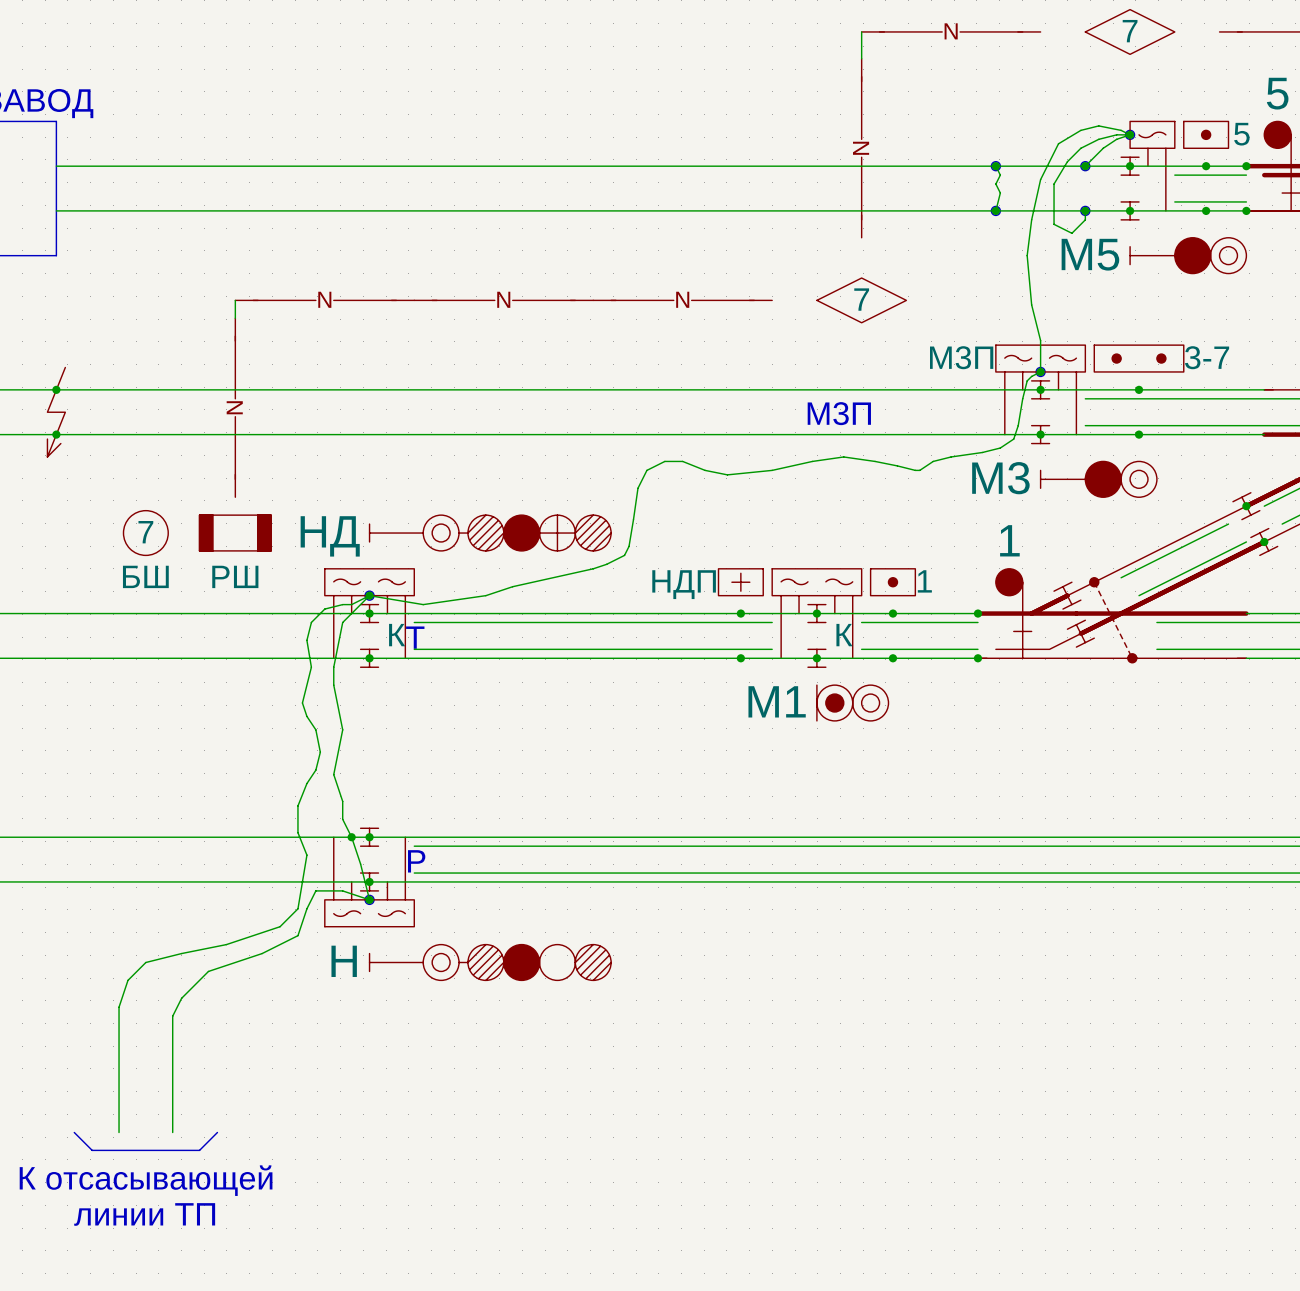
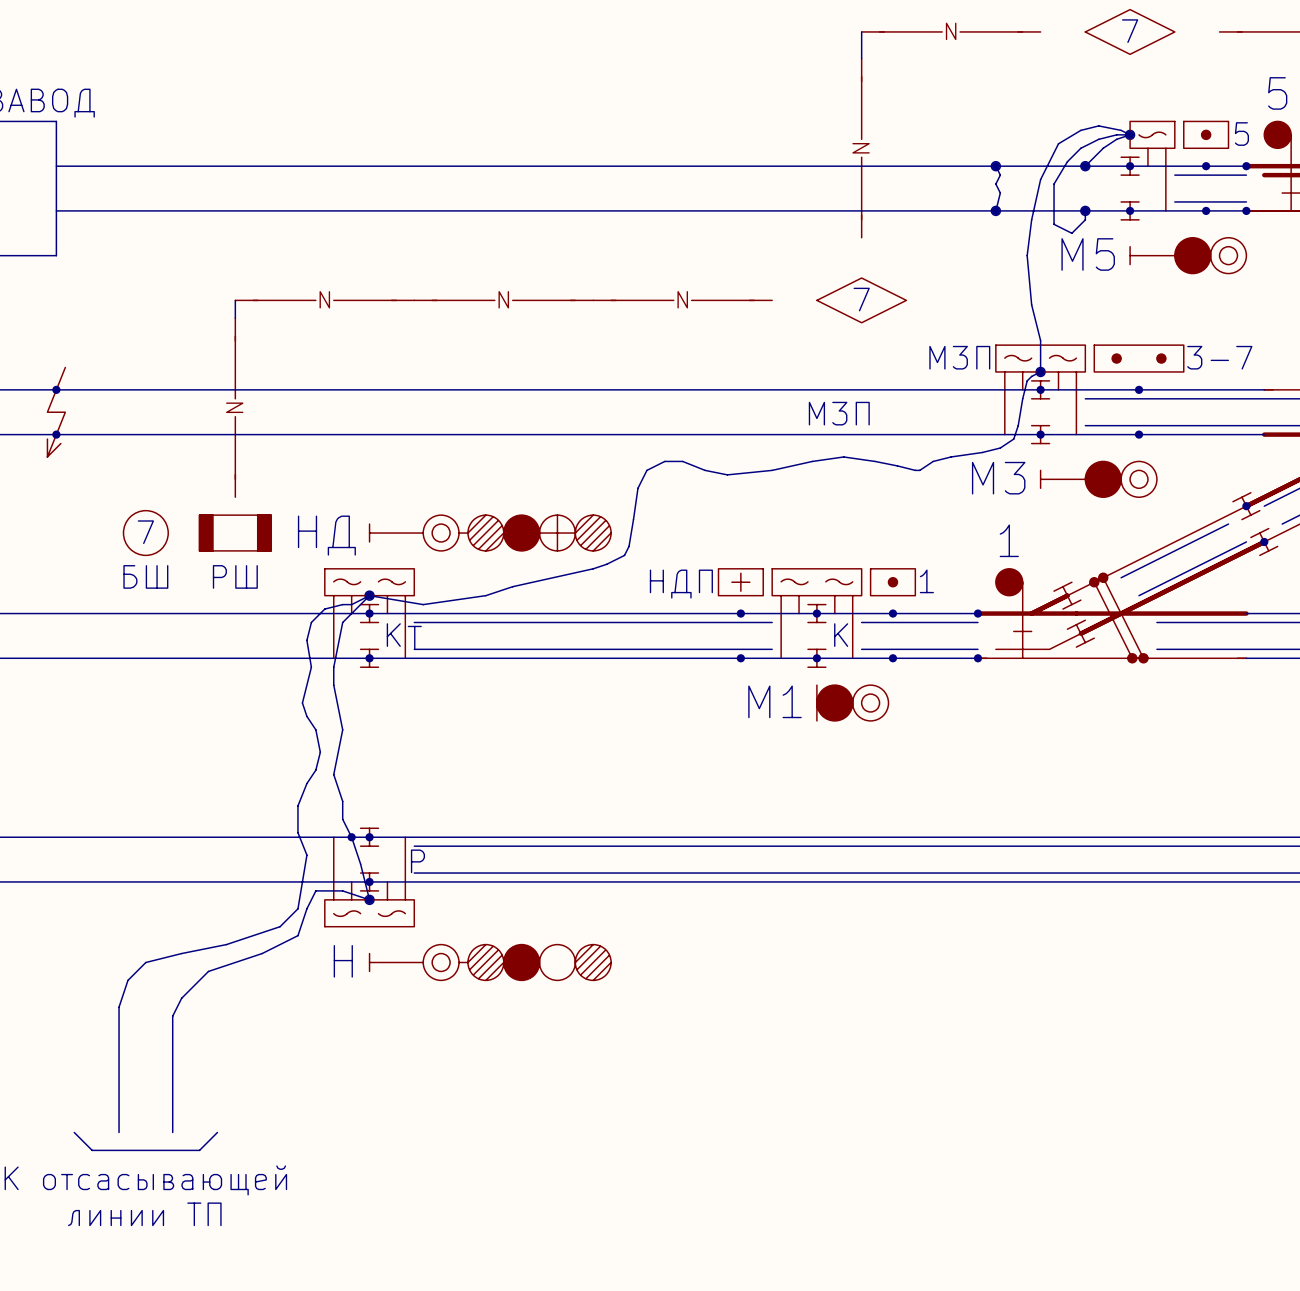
part symbol: [1089, 577, 1137, 663] -> [1089, 573, 1148, 663]
part symbol: [816, 685, 889, 721] -> [816, 685, 889, 721]

